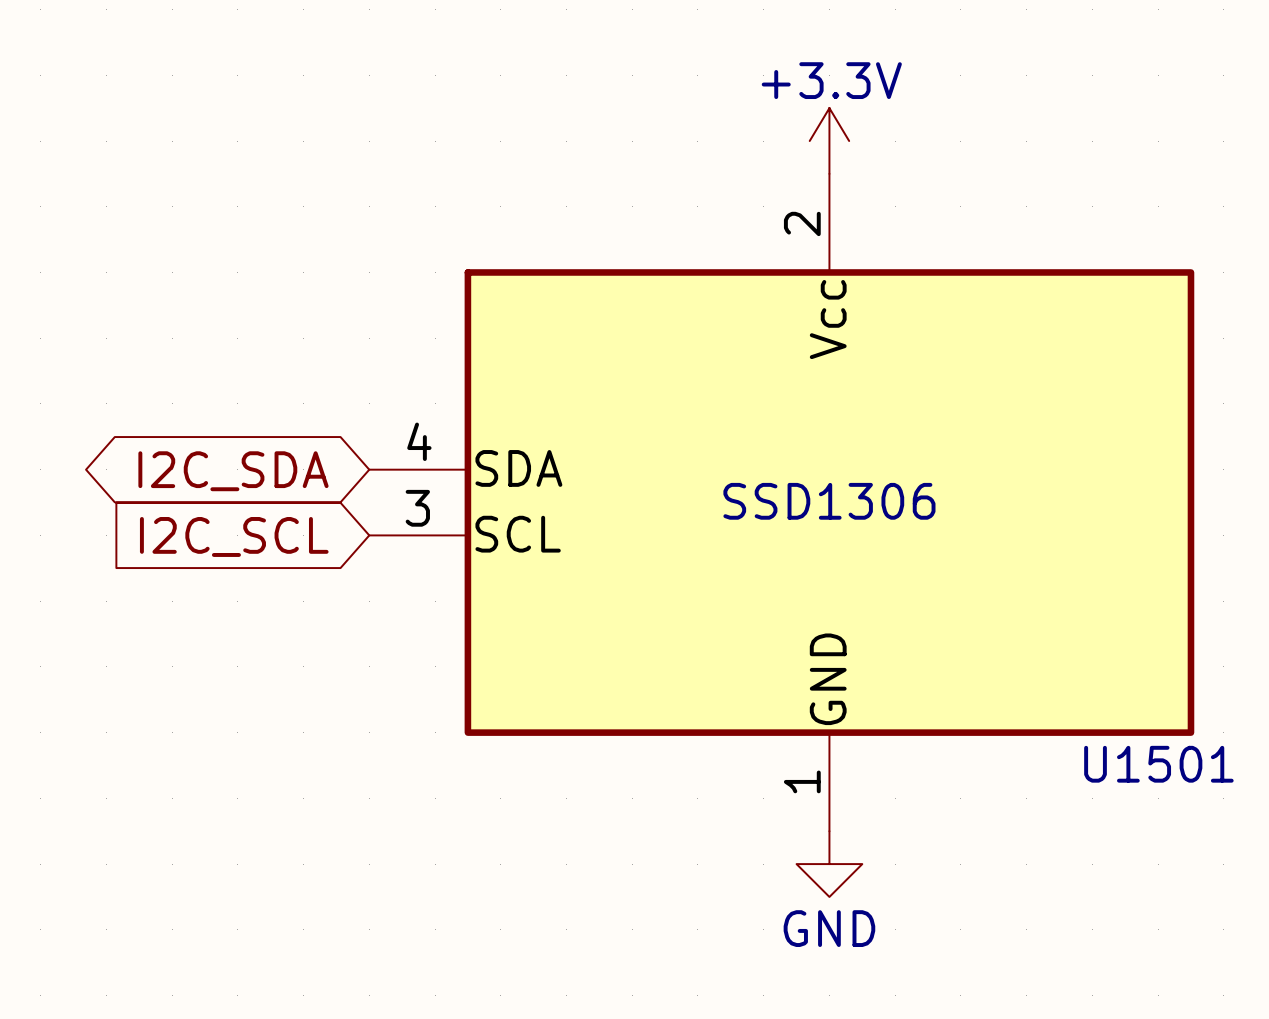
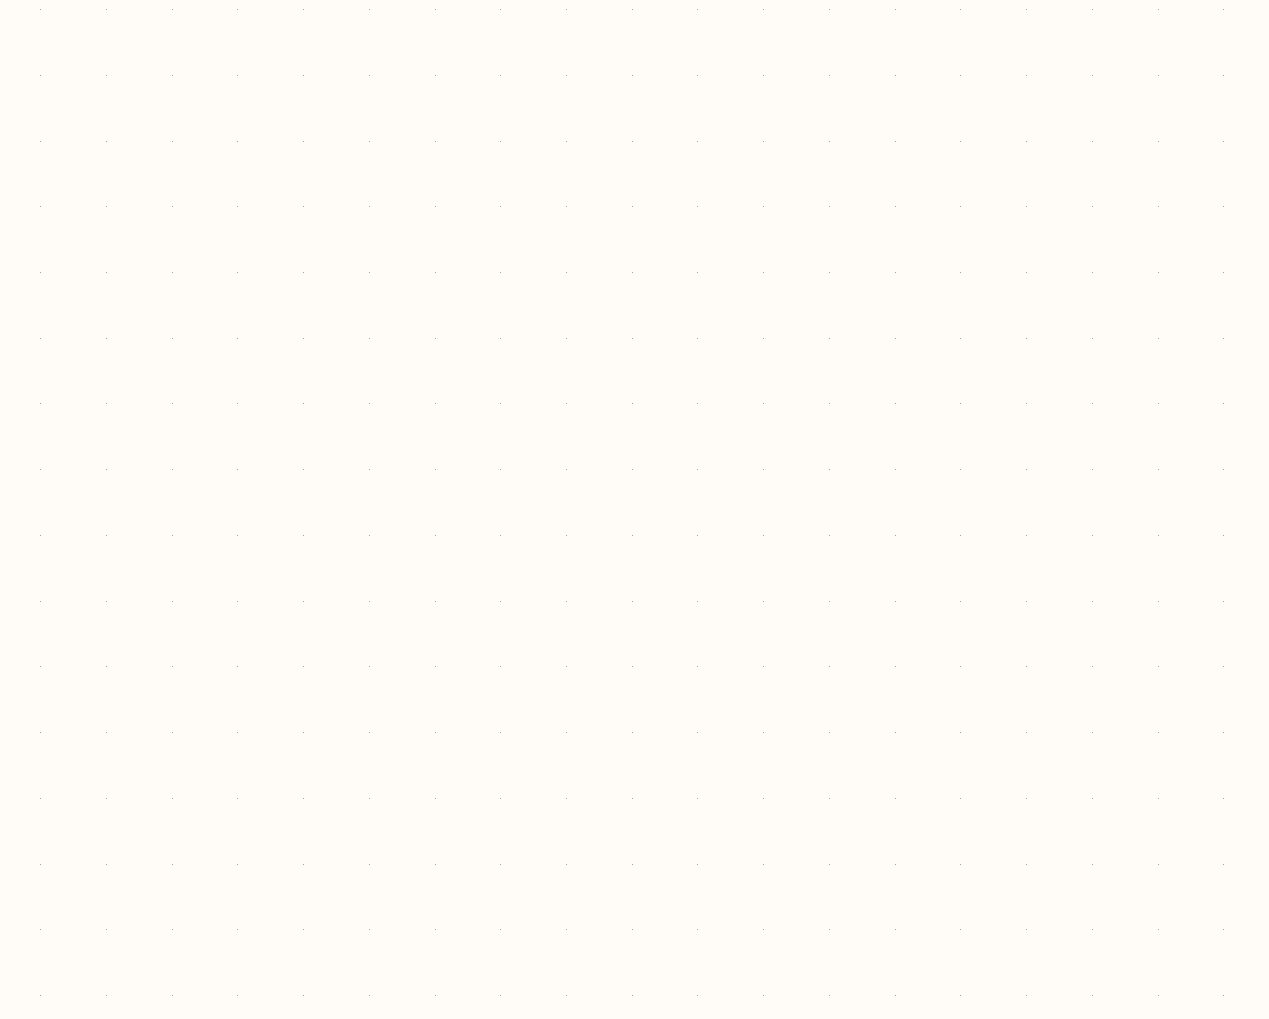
power symbol: +3.3V (829, 141) -> none
global label: I2C_SDA (233, 471) -> none
U1501: SSD1306 (781, 502) -> none
global label: I2C_SCL (234, 536) -> none
power symbol: GND (829, 864) -> none

